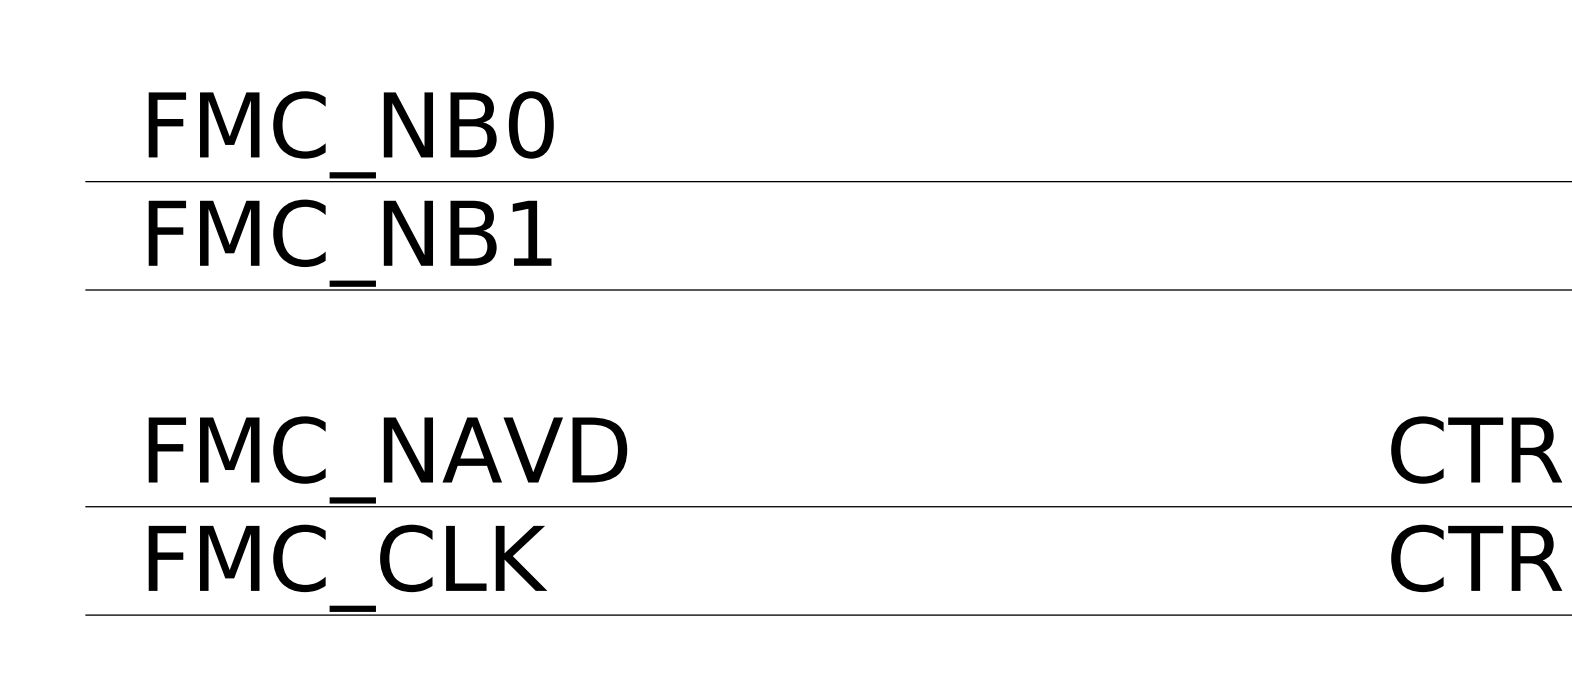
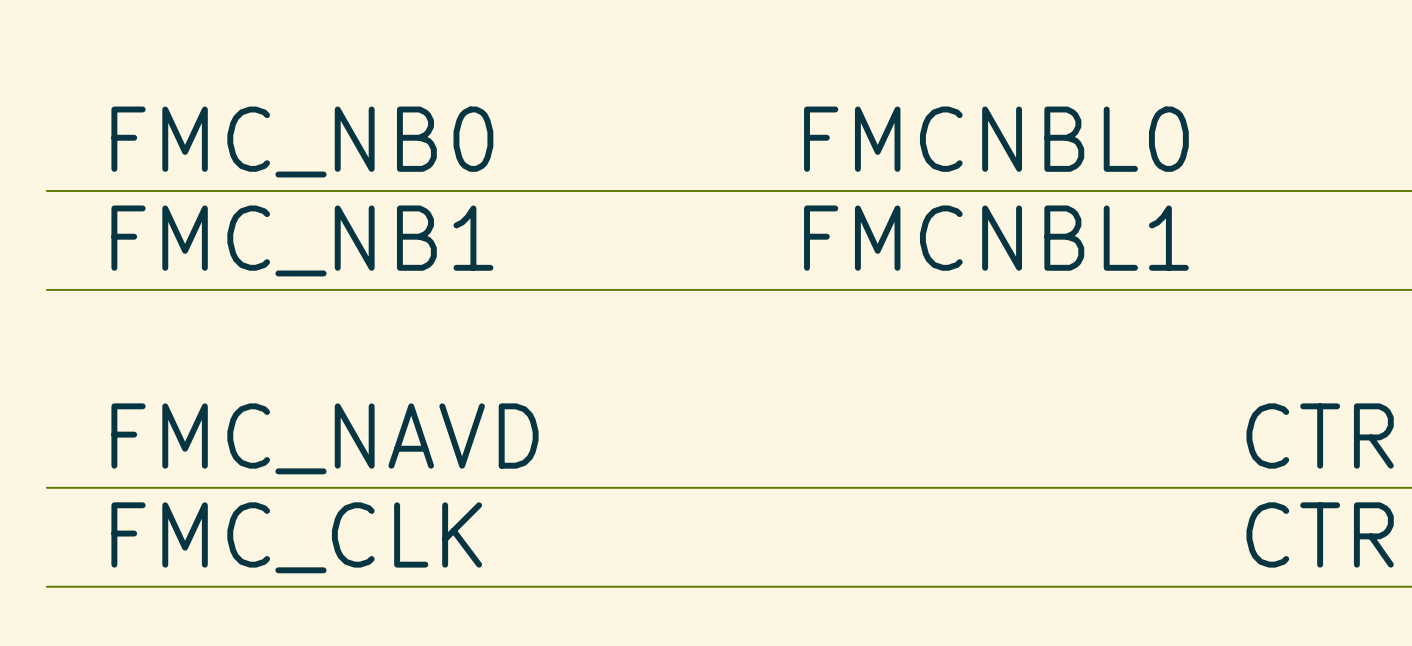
label: none -> FMCNBL0 (996, 139)
label: none -> FMCNBL1 (996, 238)

